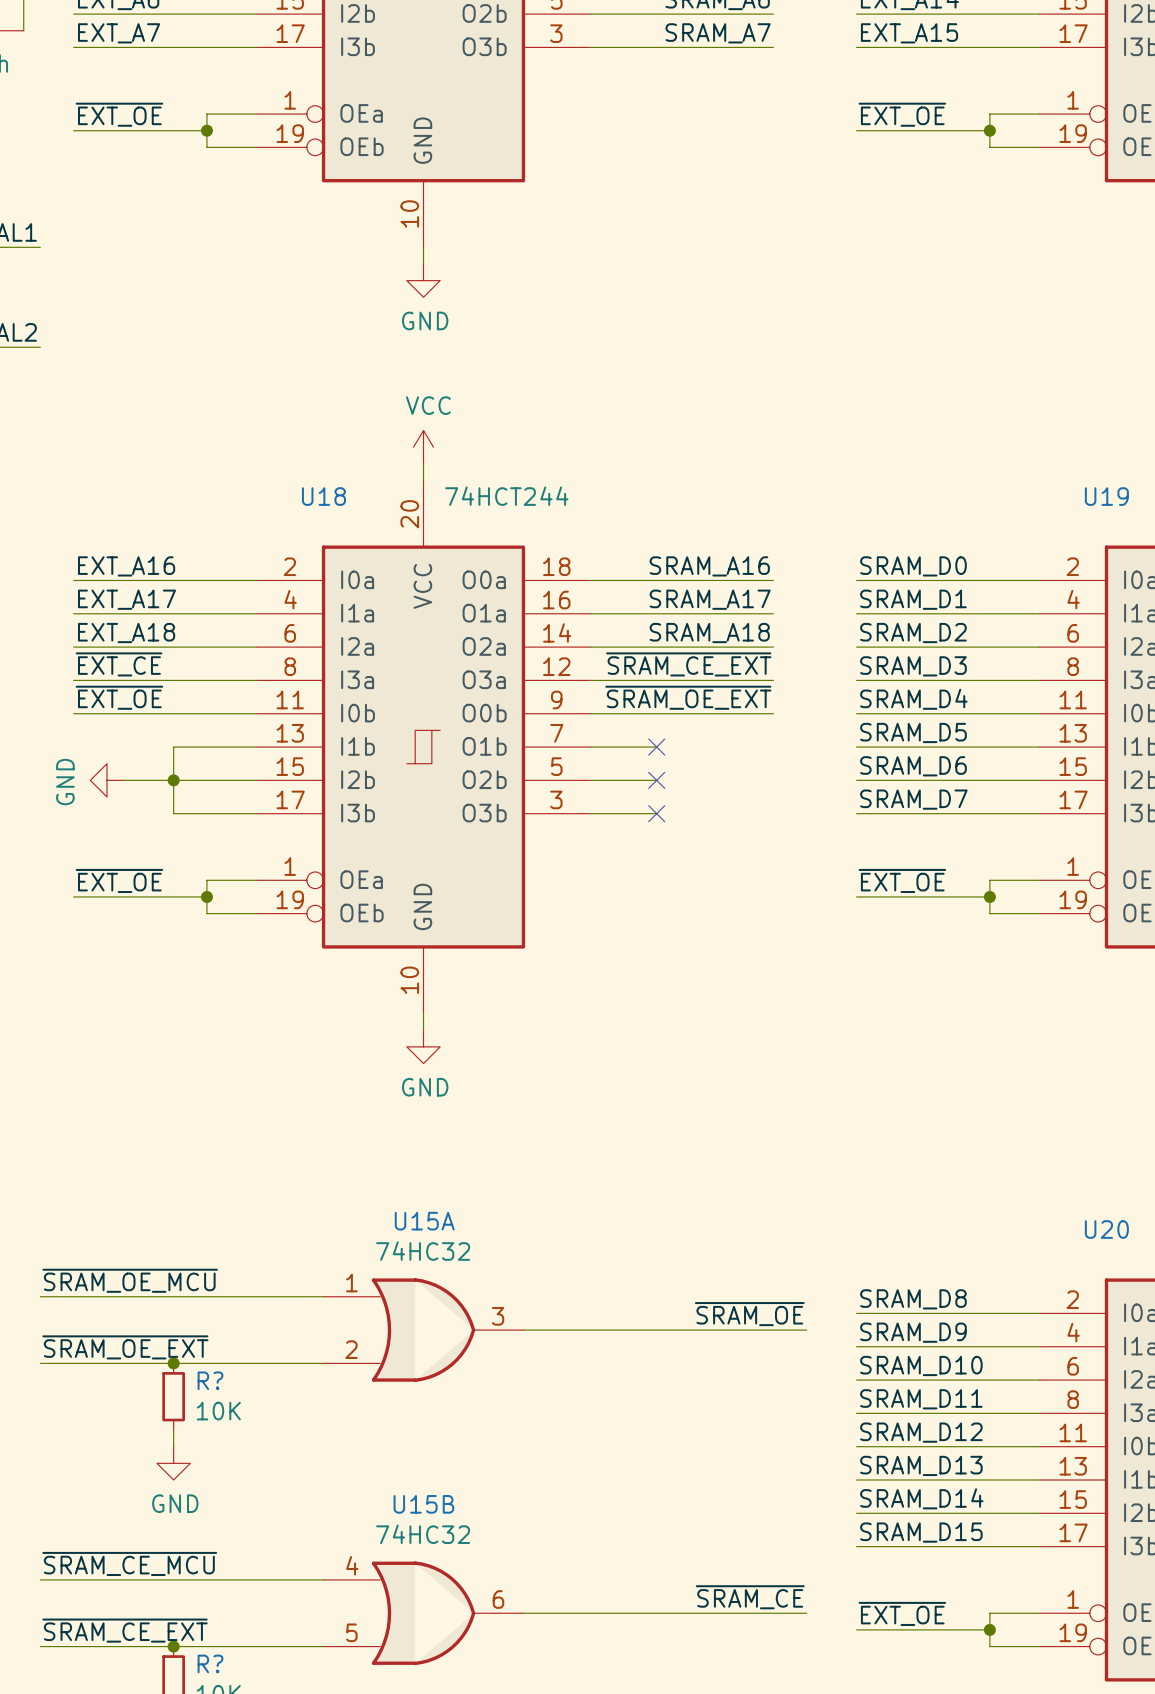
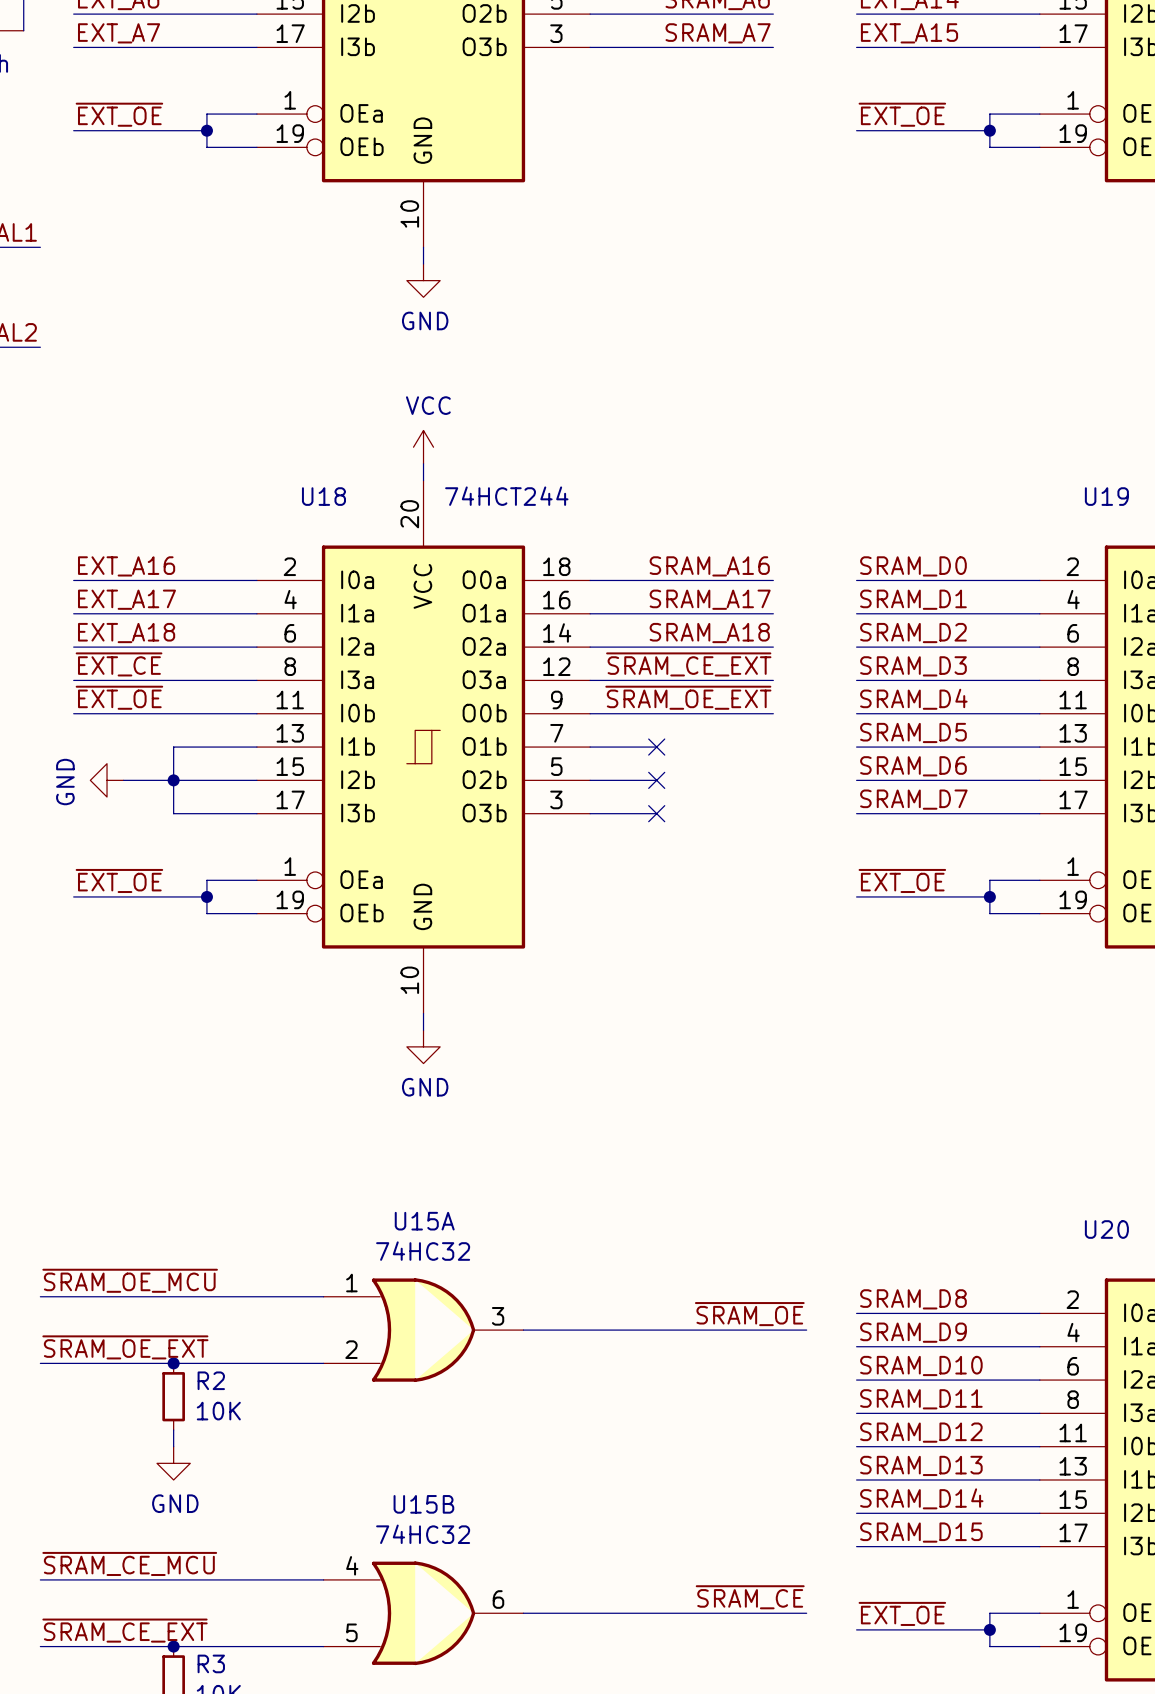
R? name: R? (210, 1380) -> R2 (211, 1380)
R? name: R? (210, 1663) -> R3 (211, 1663)

